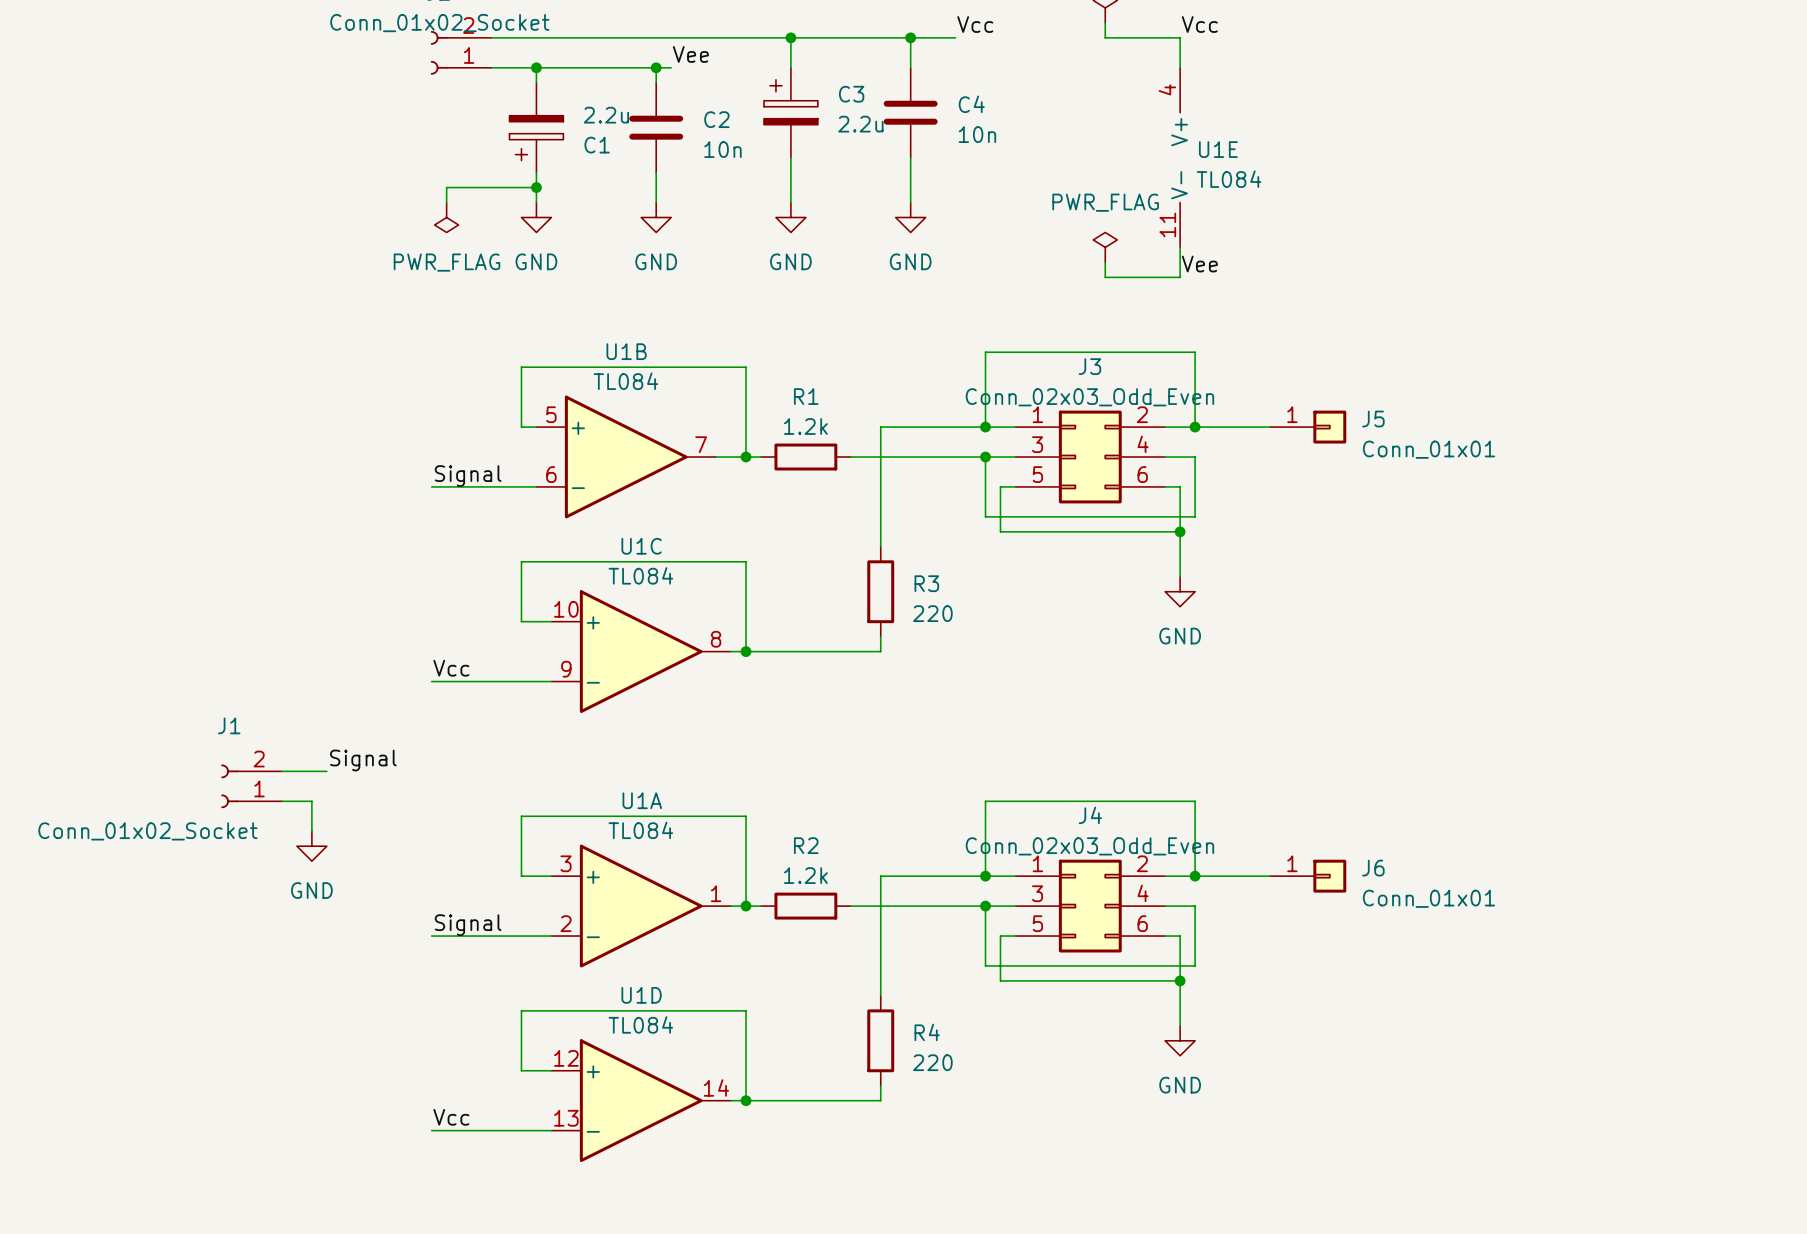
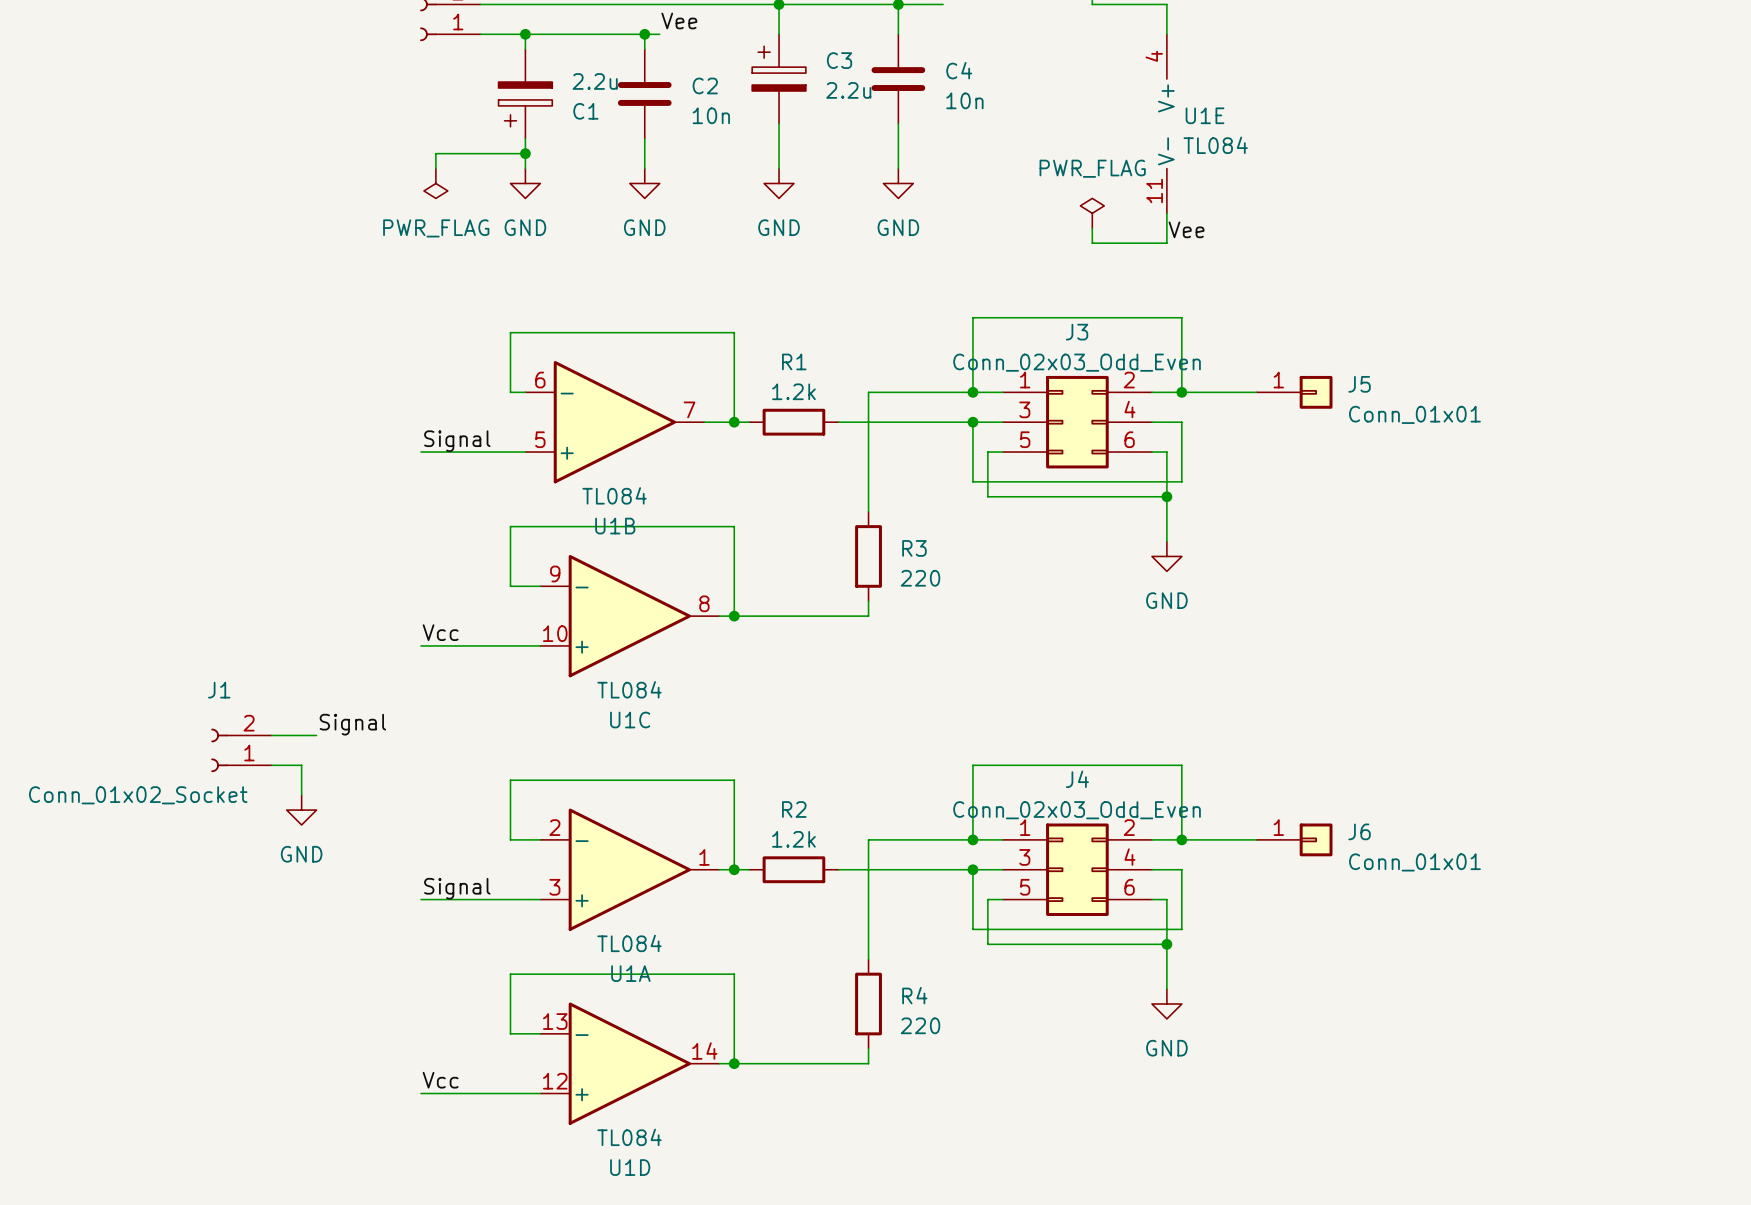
U1B flip: as is (626, 457) -> up-down (614, 422)
U1C flip: as is (641, 651) -> up-down (629, 616)
U1A flip: as is (641, 906) -> up-down (629, 869)
U1D flip: as is (641, 1100) -> up-down (629, 1063)

